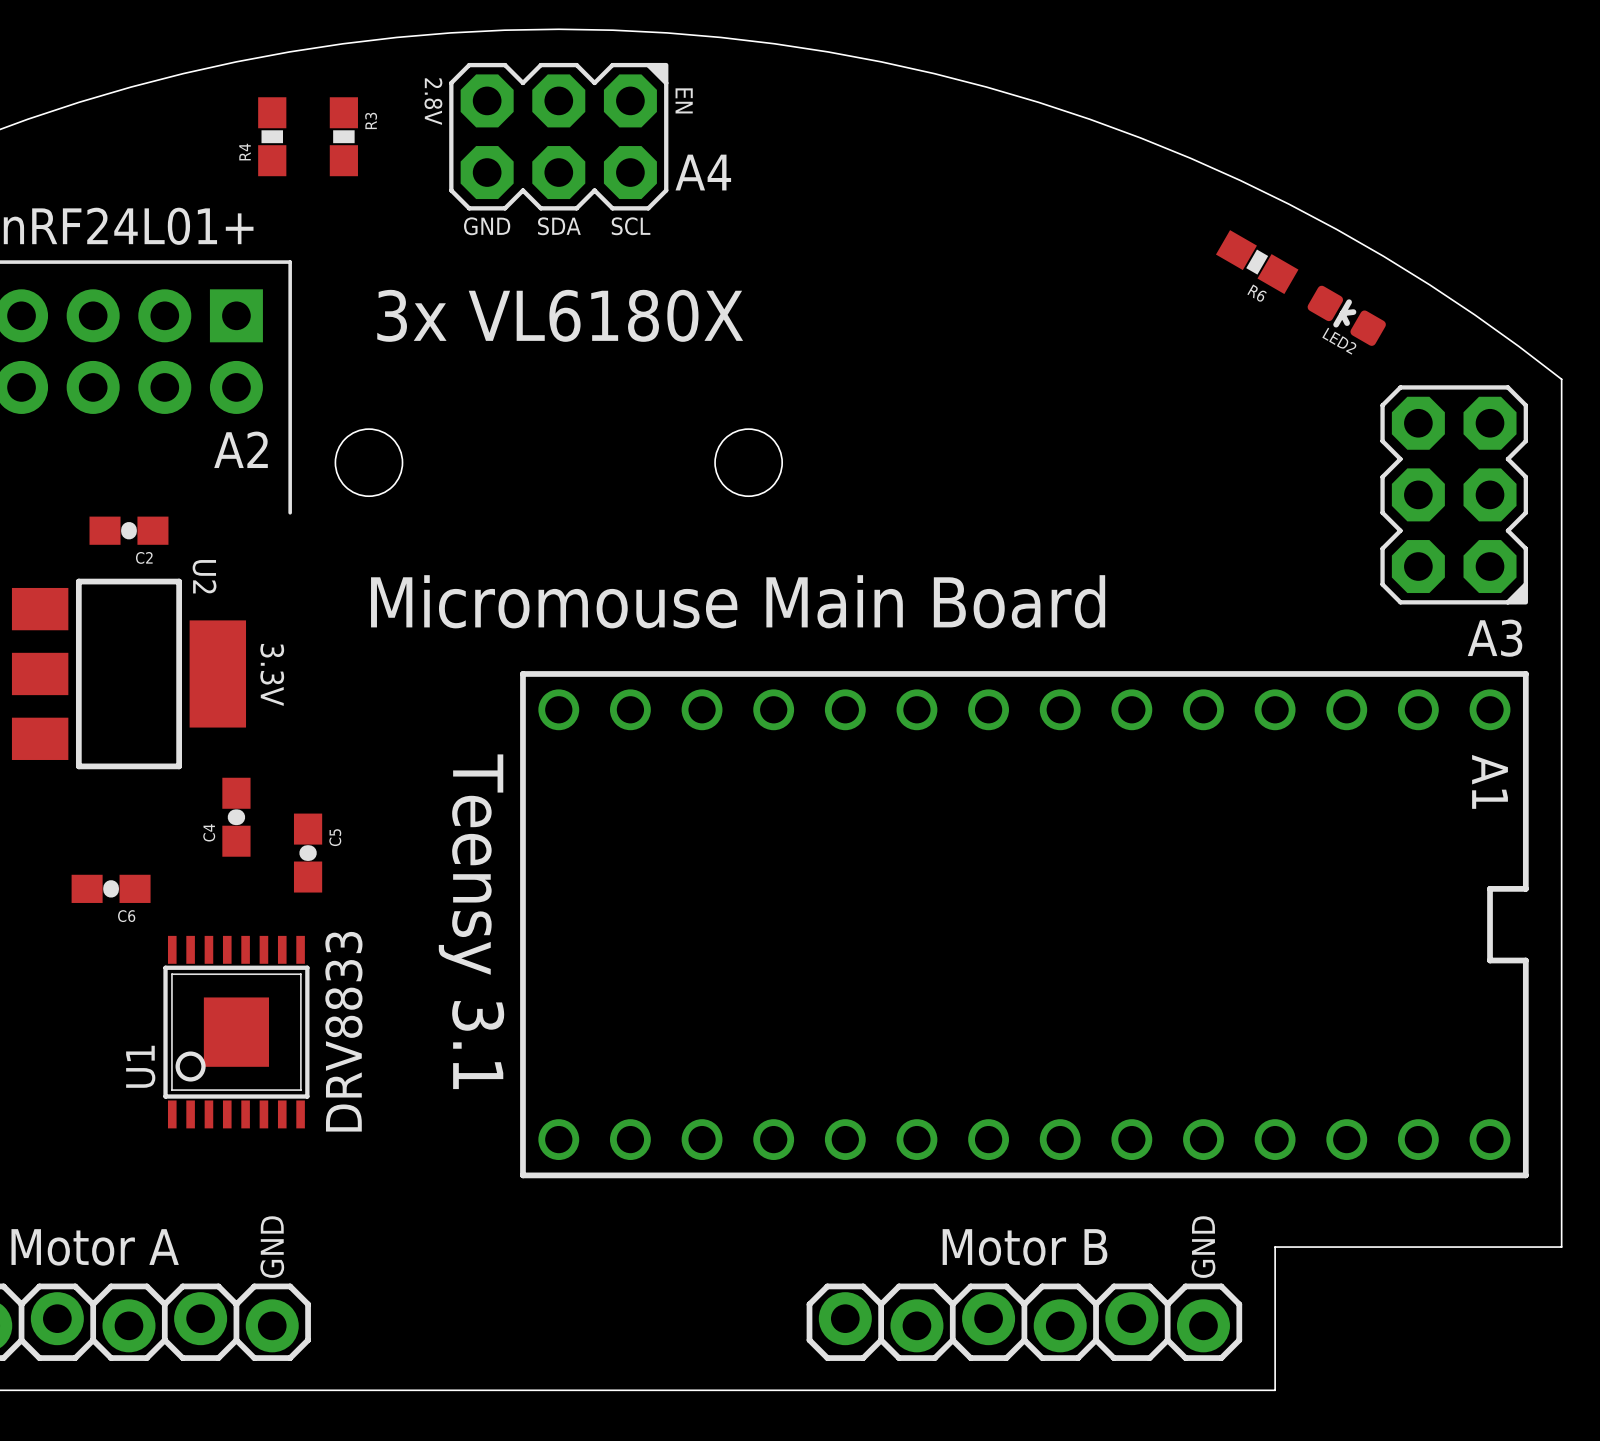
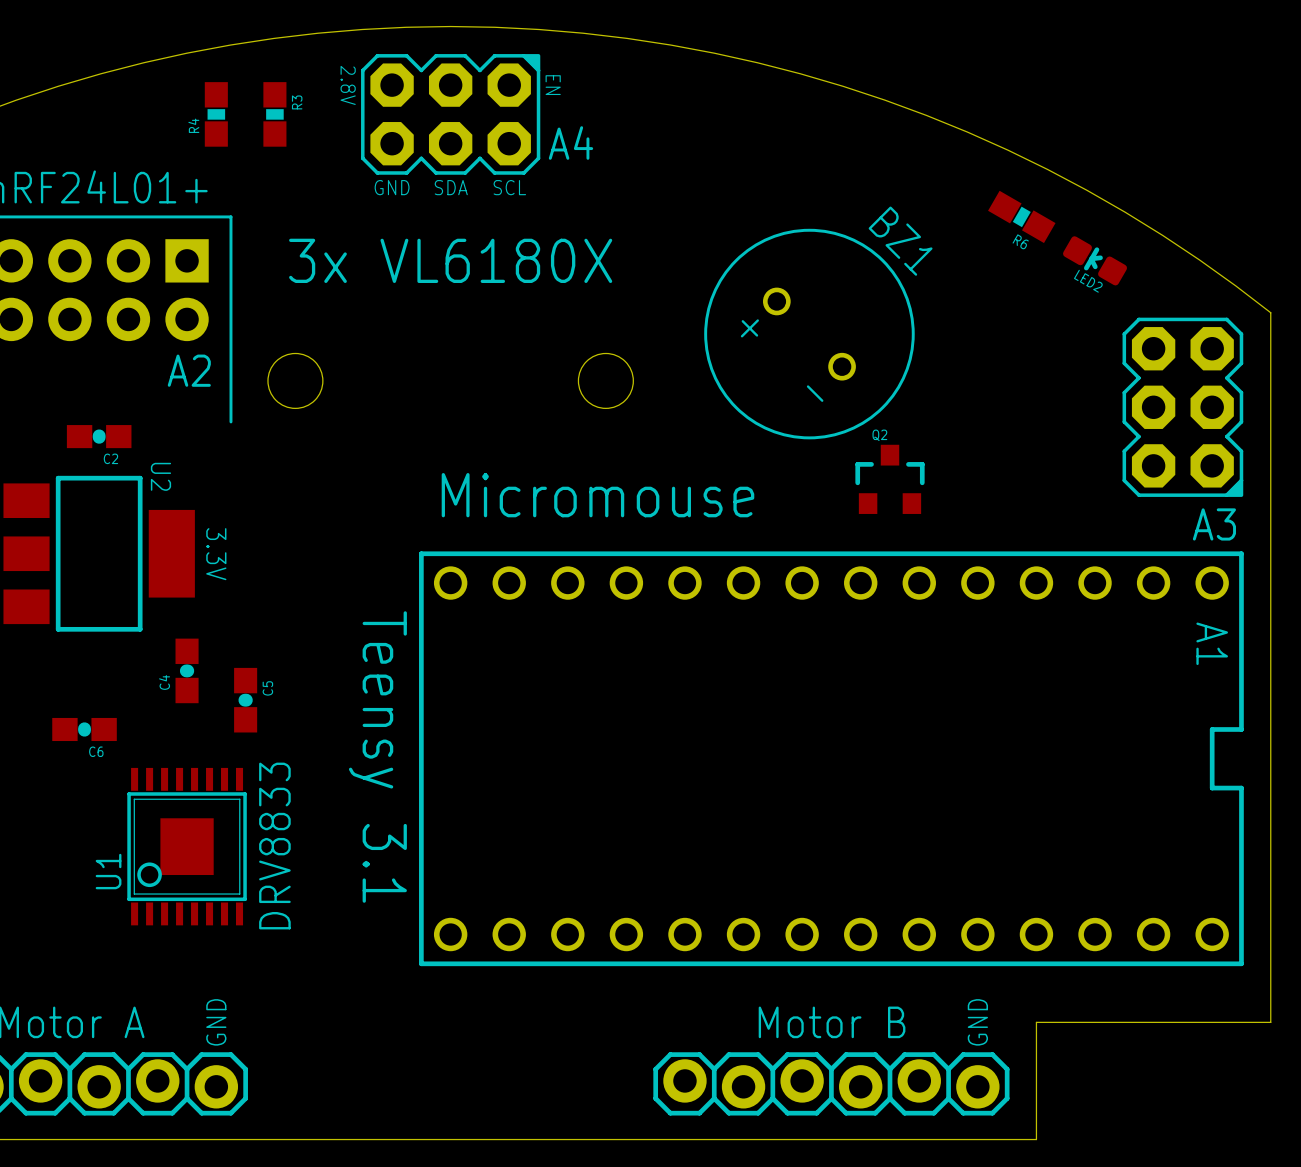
BZ1: none -> (809, 334)
Q2: none -> (890, 479)
text: Micromouse Main Board (738, 601) -> Micromouse (597, 495)

